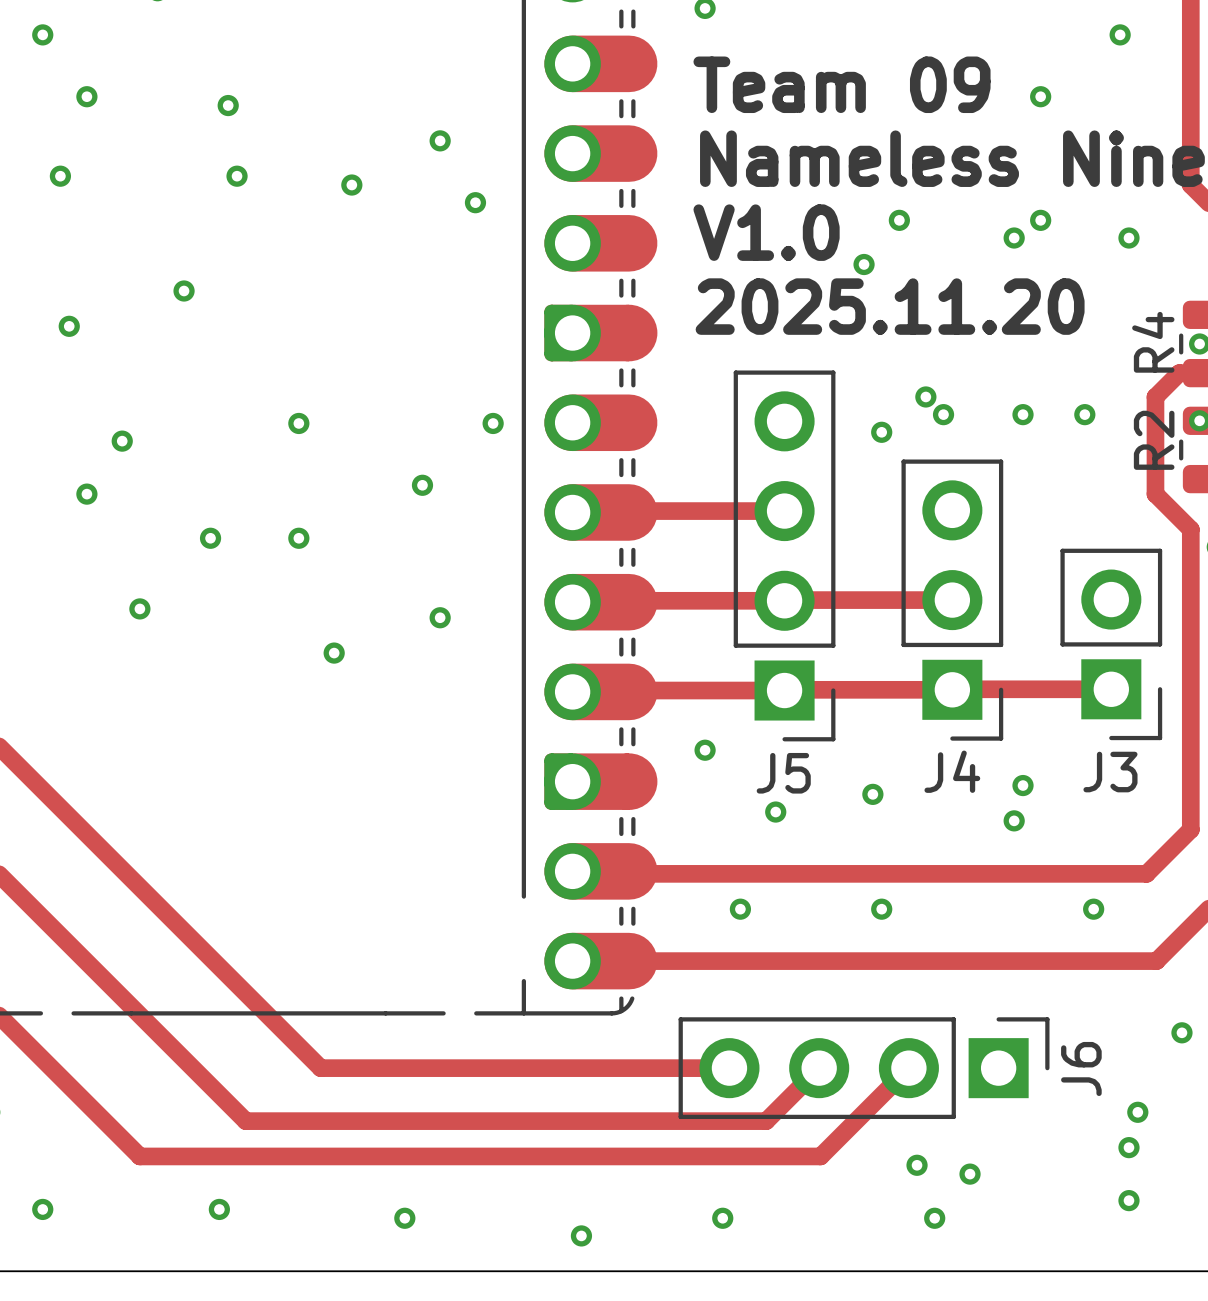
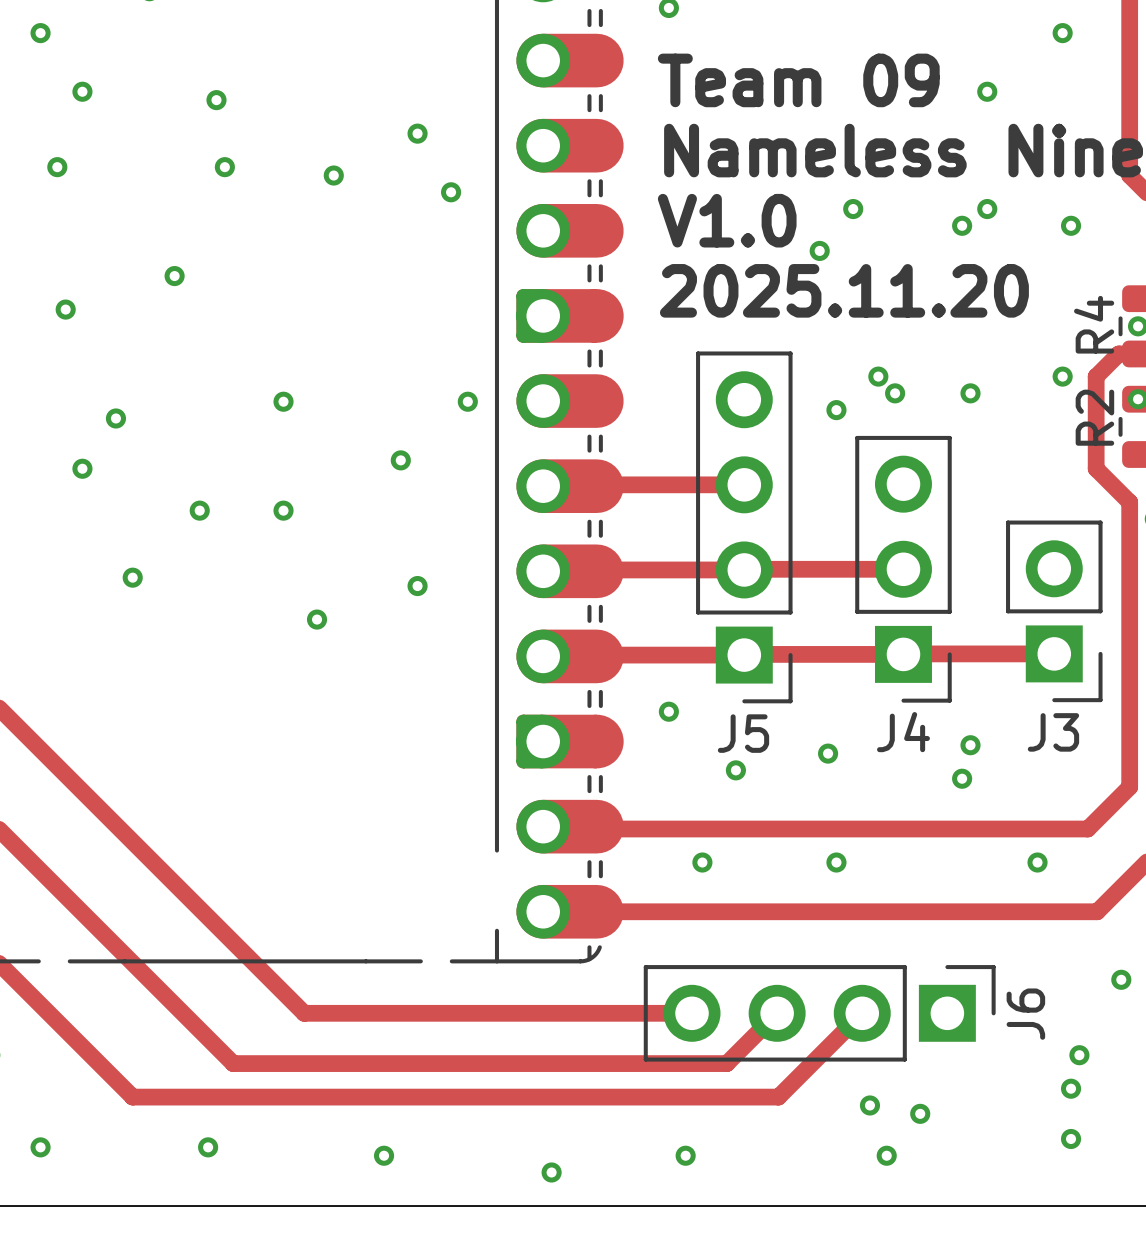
via position: (1084, 414) -> (1062, 376)

